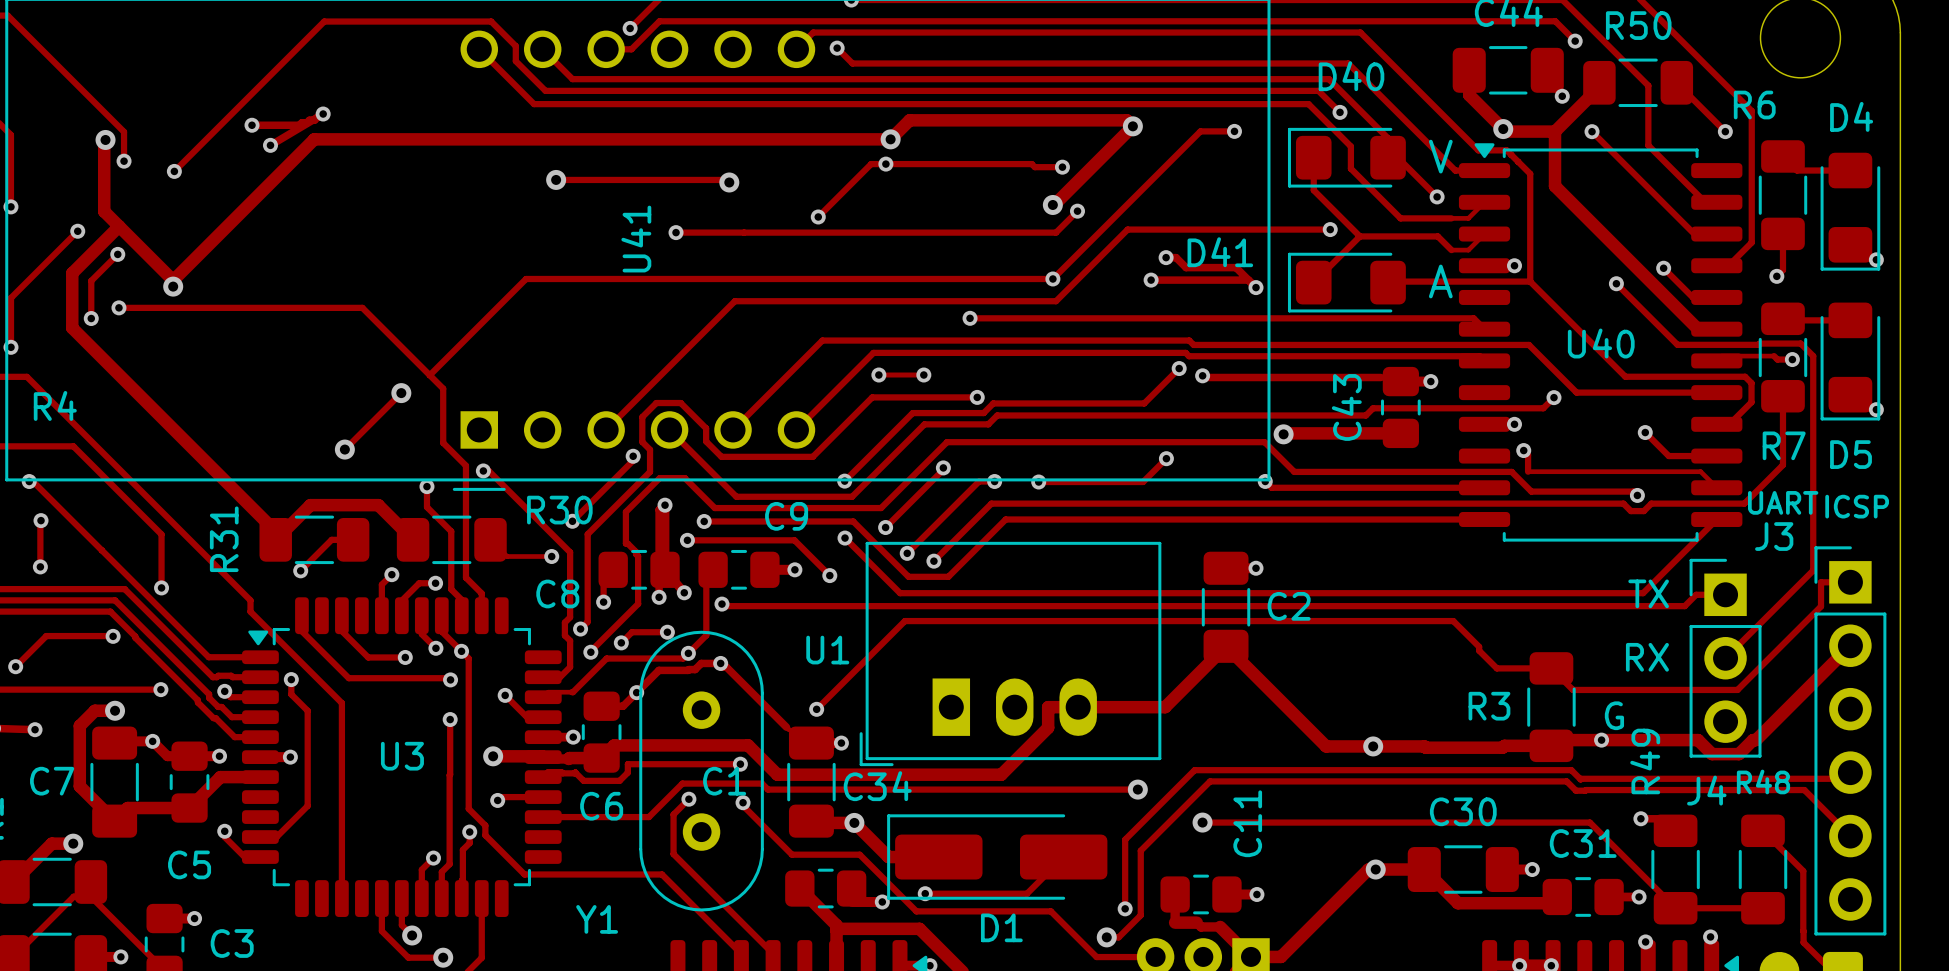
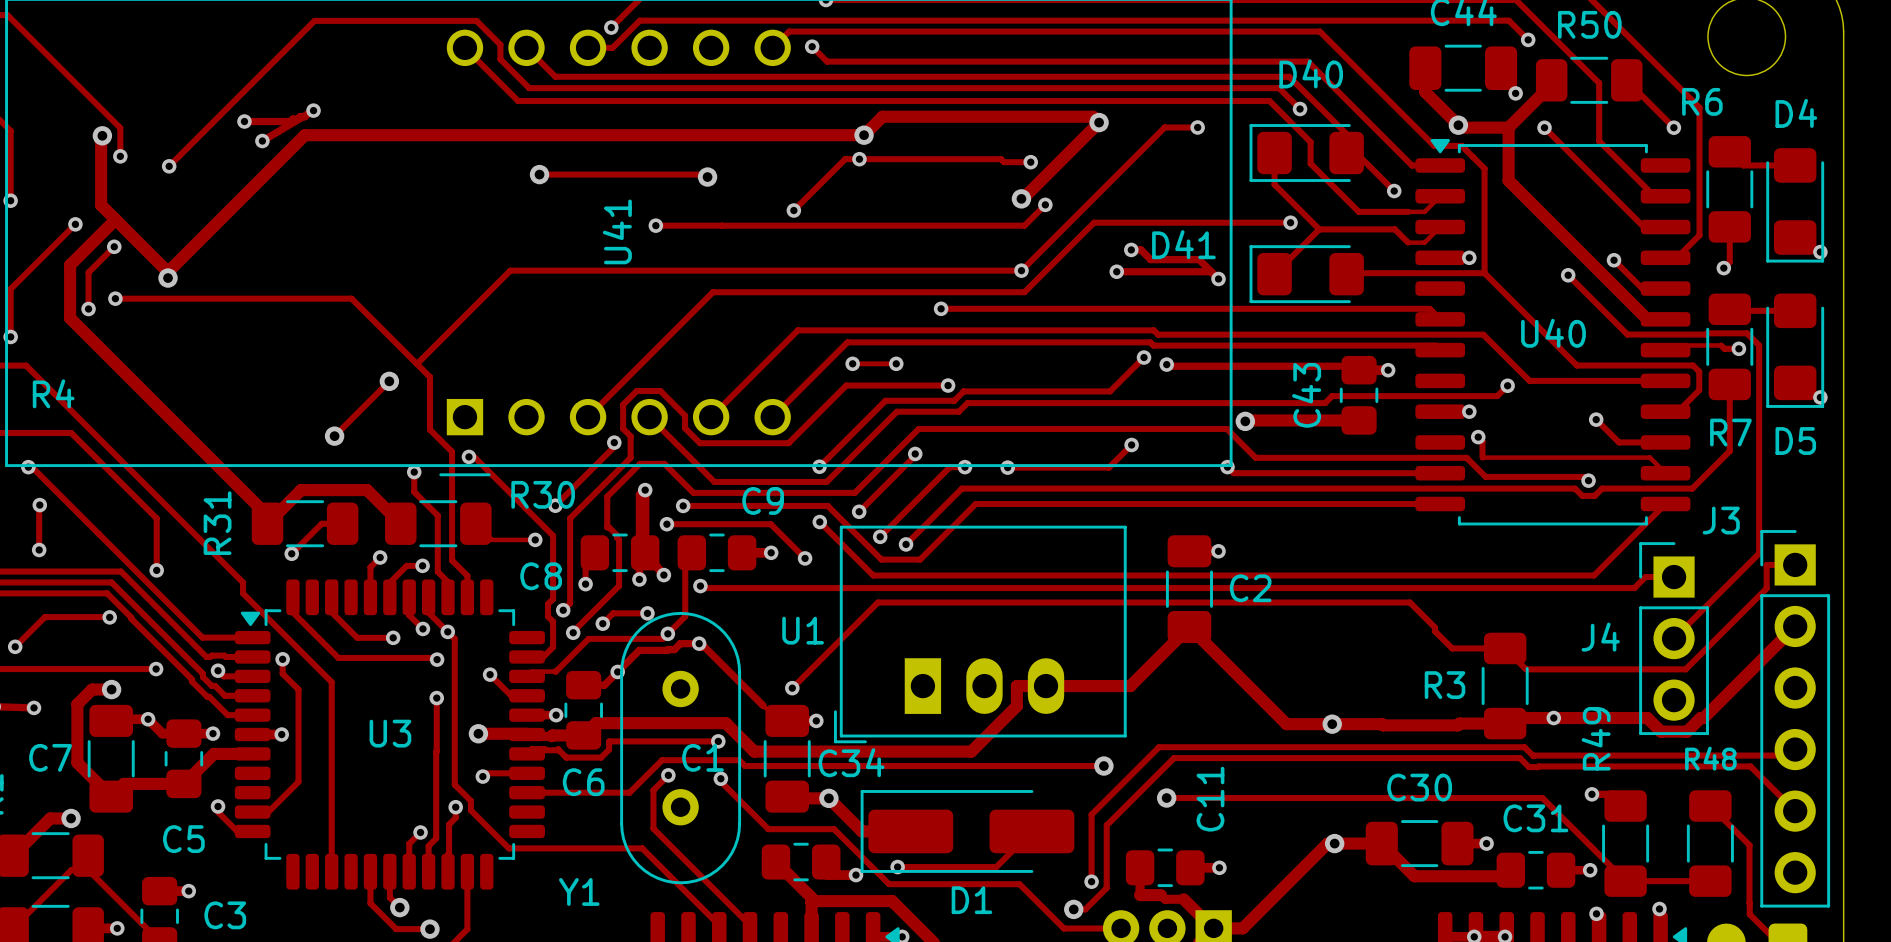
text: V (1440, 156) -> none
text: A (1440, 281) -> none
text: UART (1783, 502) -> none
text: ICSP (1857, 506) -> none
text: TX (1648, 593) -> none
text: RX (1647, 657) -> none
text: G (1614, 715) -> none
J4 name position: J4 (1706, 790) -> J4 (1600, 637)

